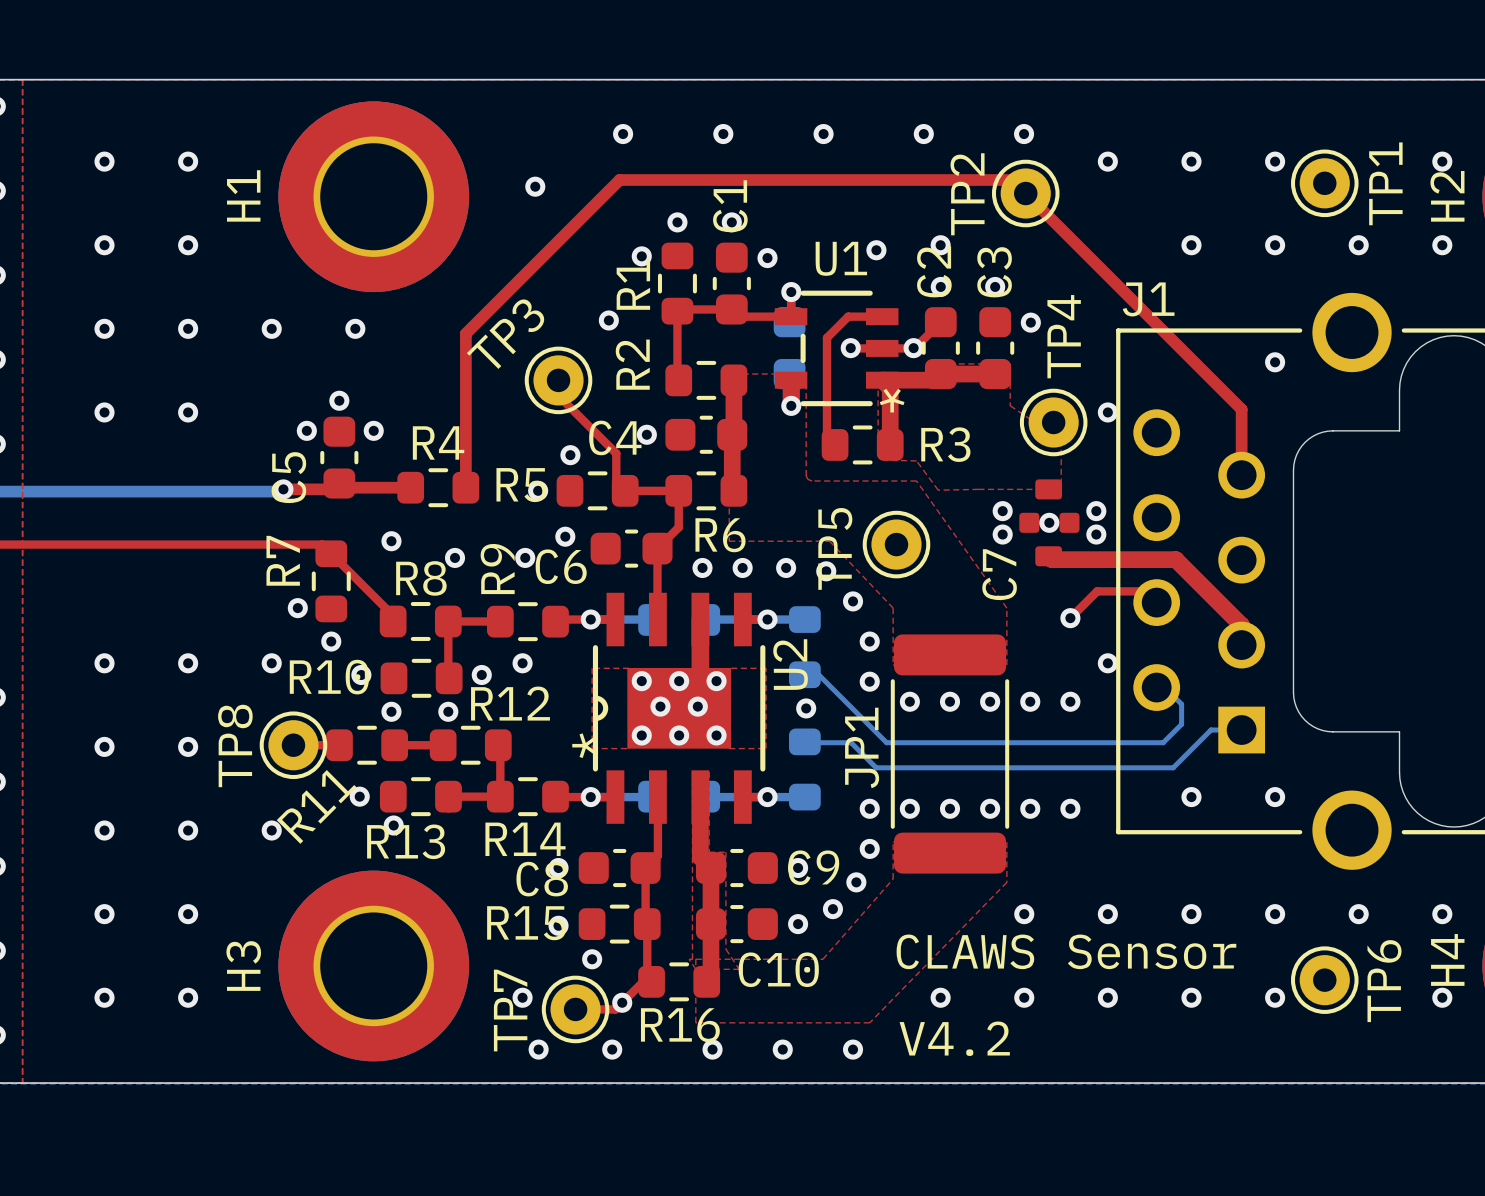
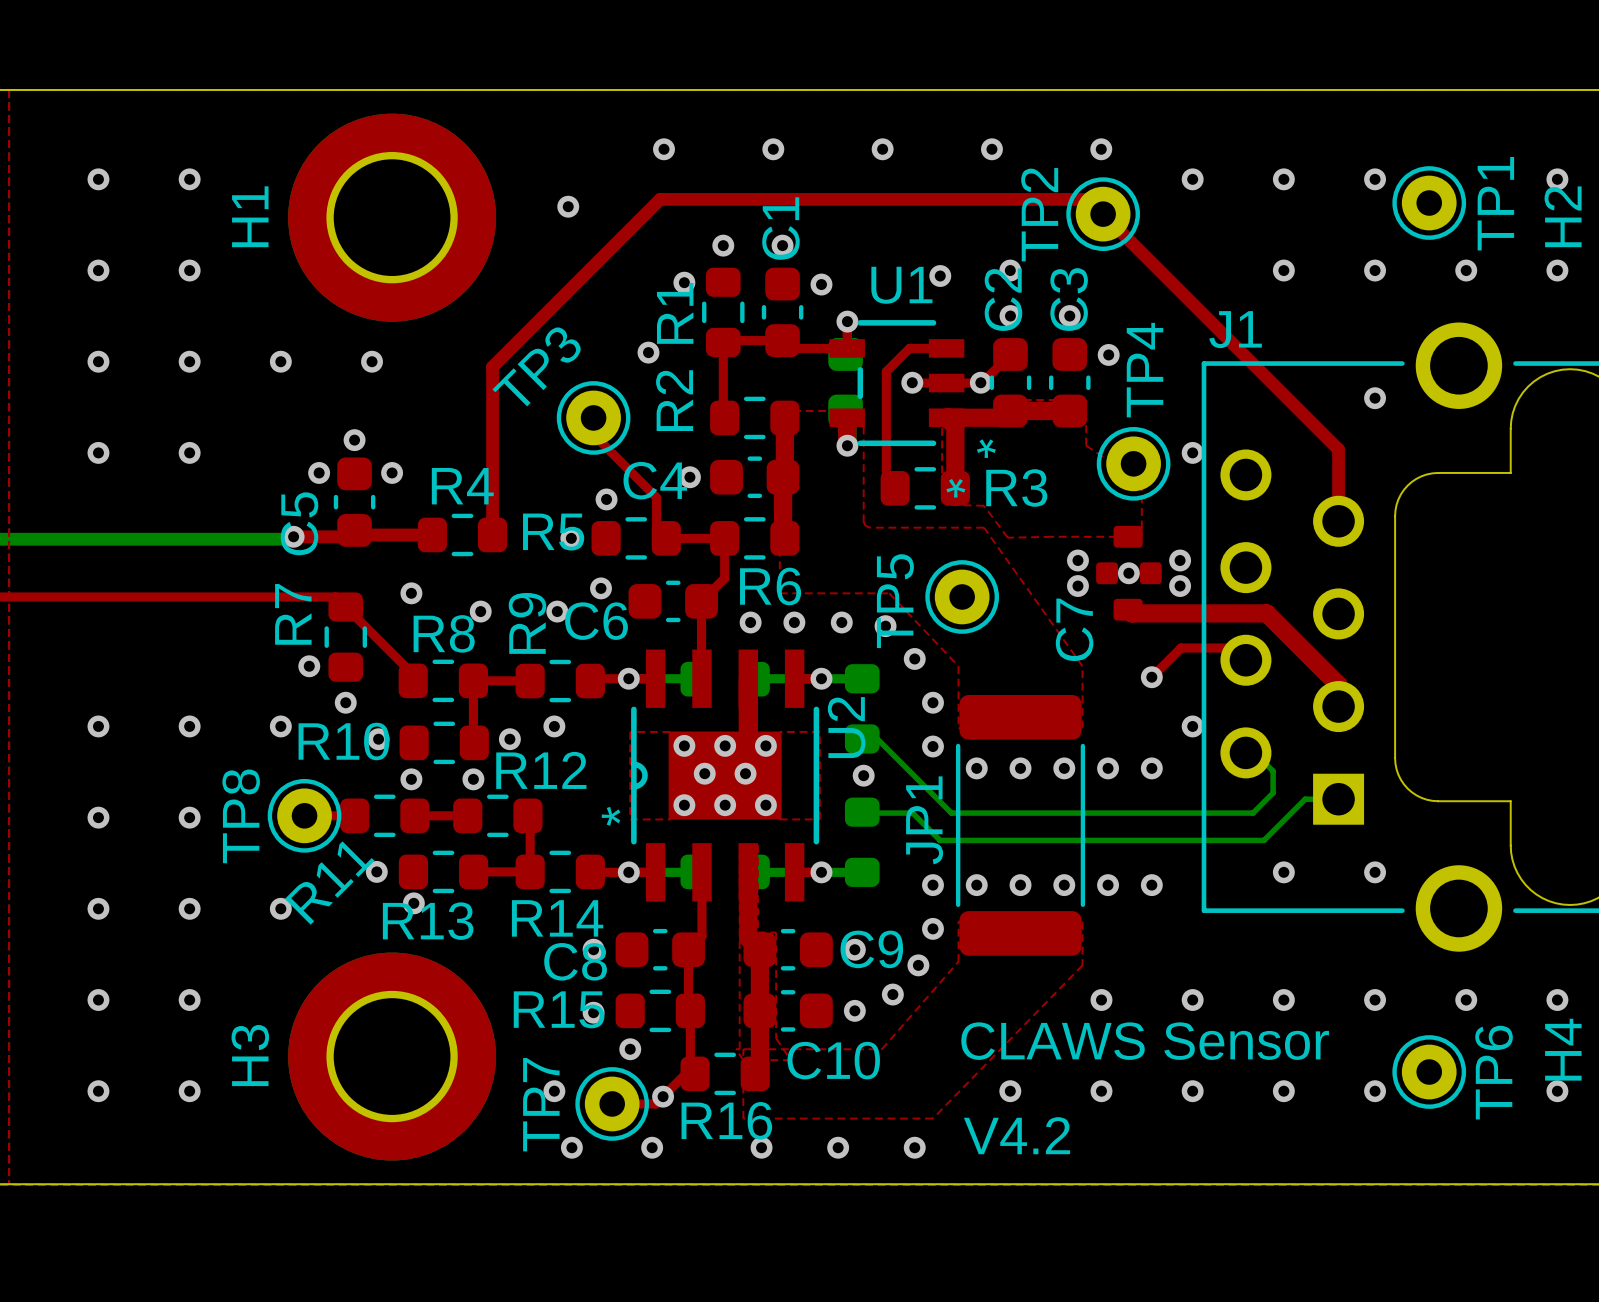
U1 text: none -> * (986, 448)
U1 text position: * (892, 400) -> * (955, 488)

